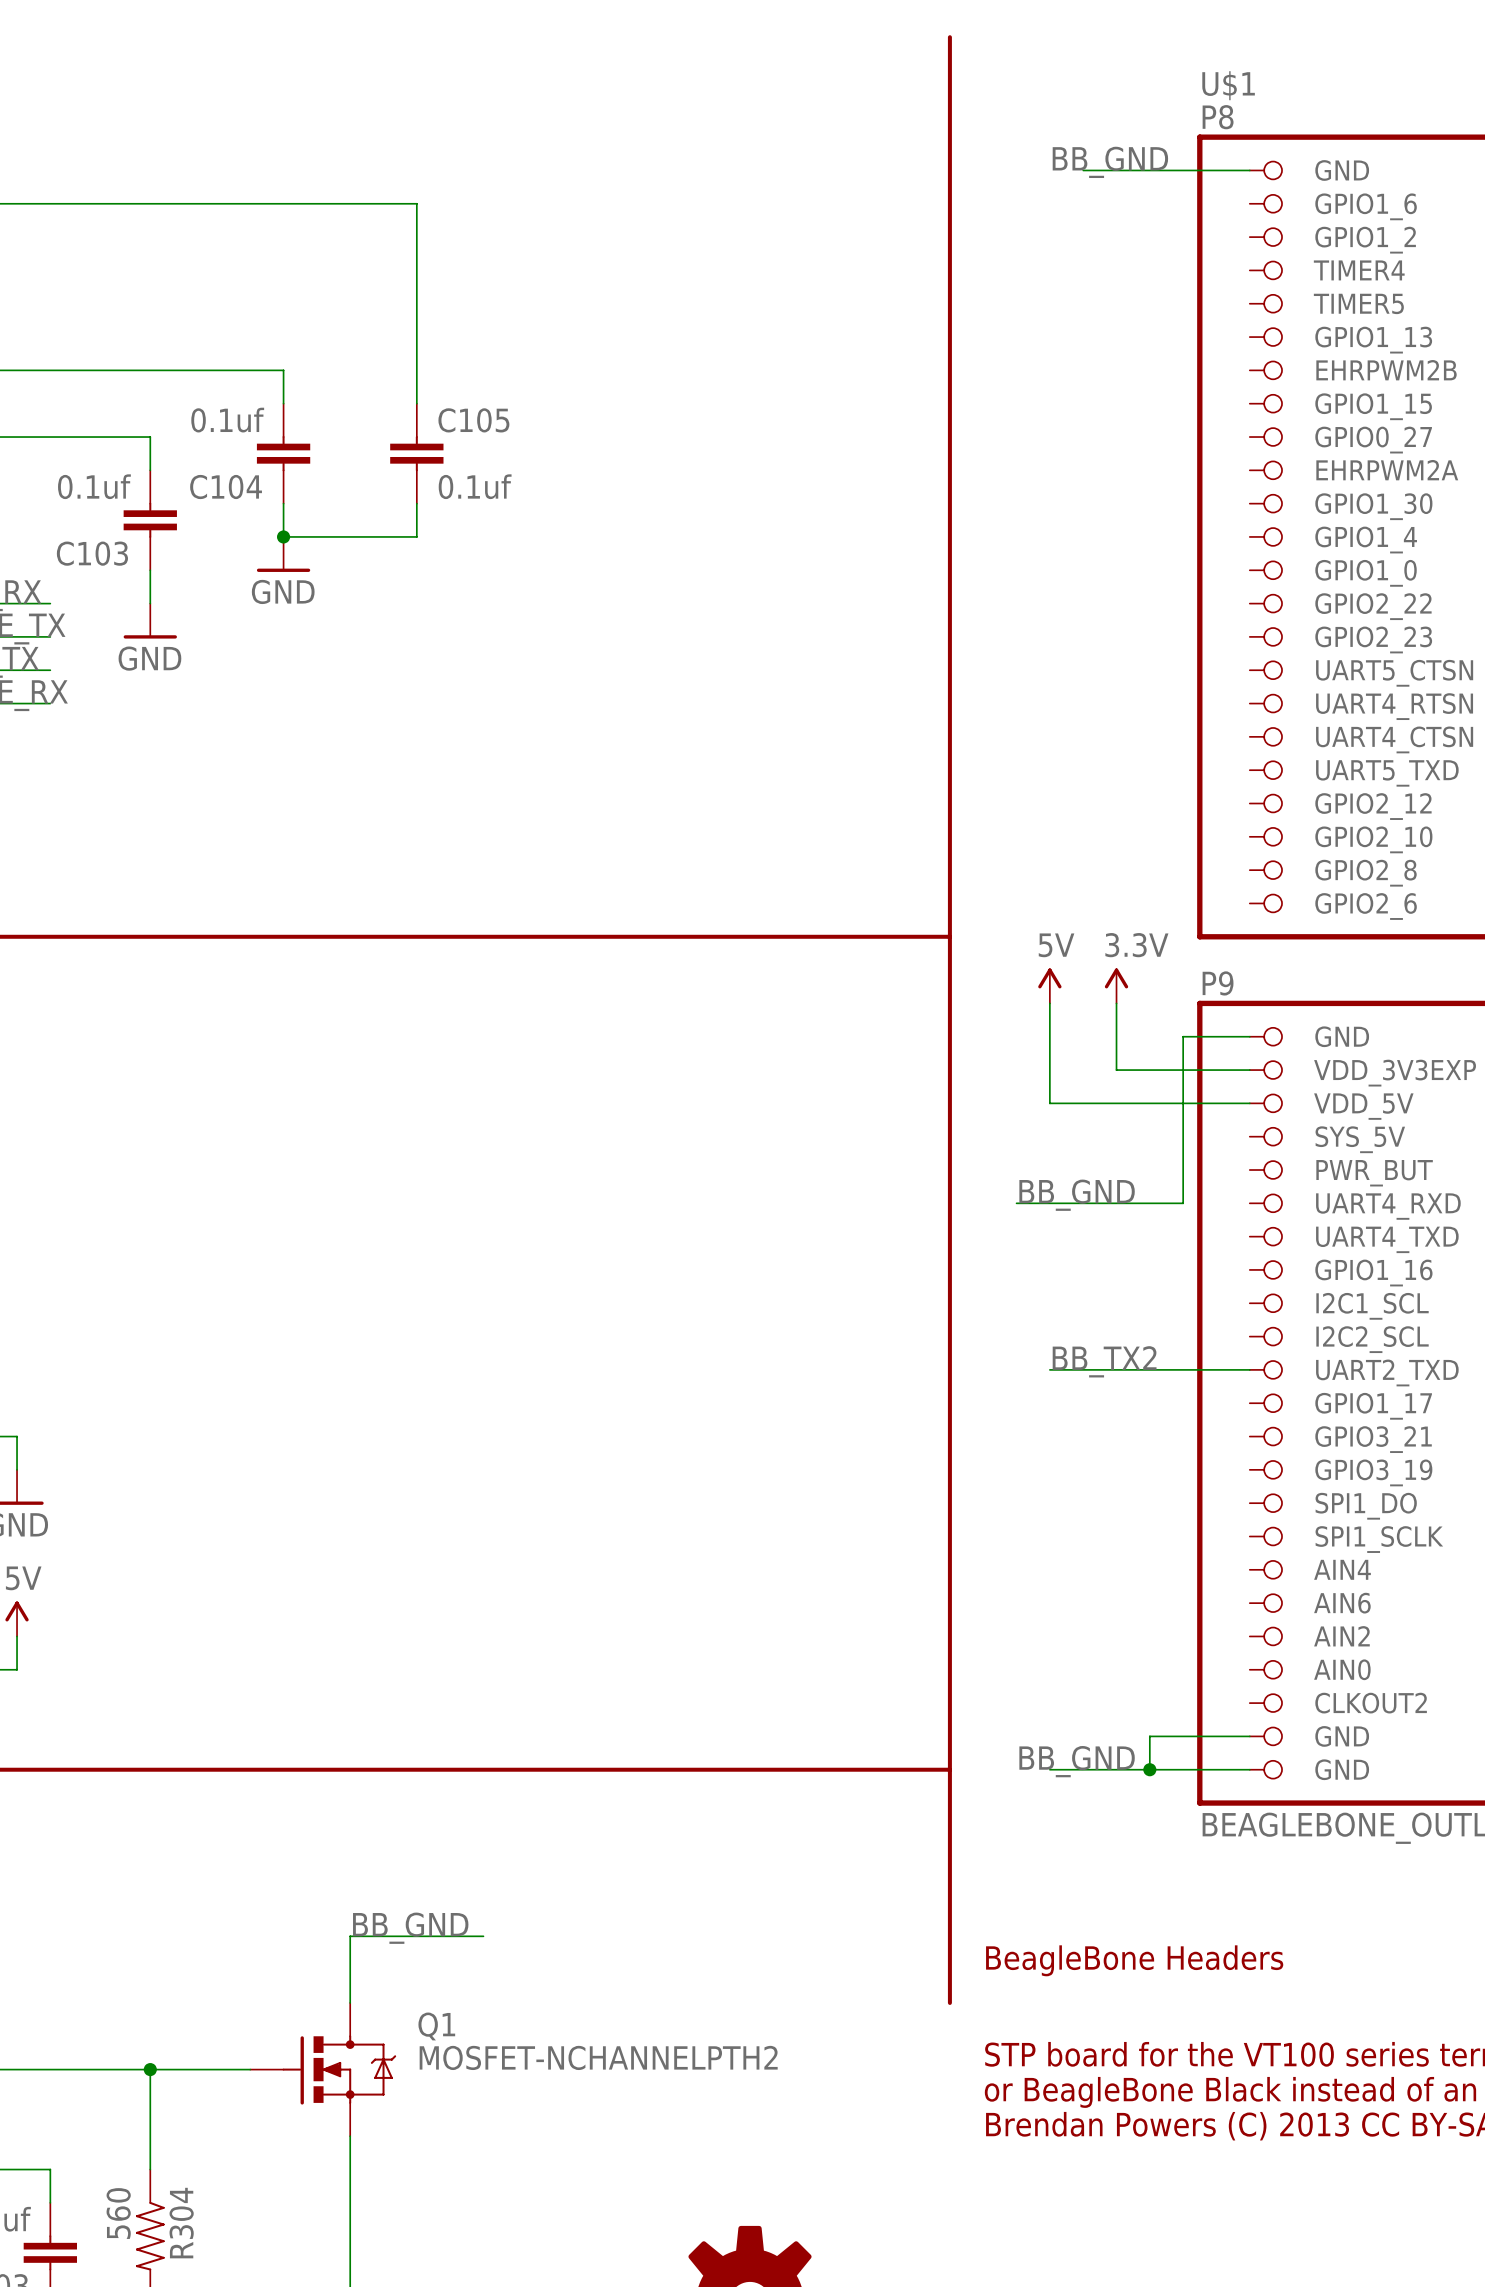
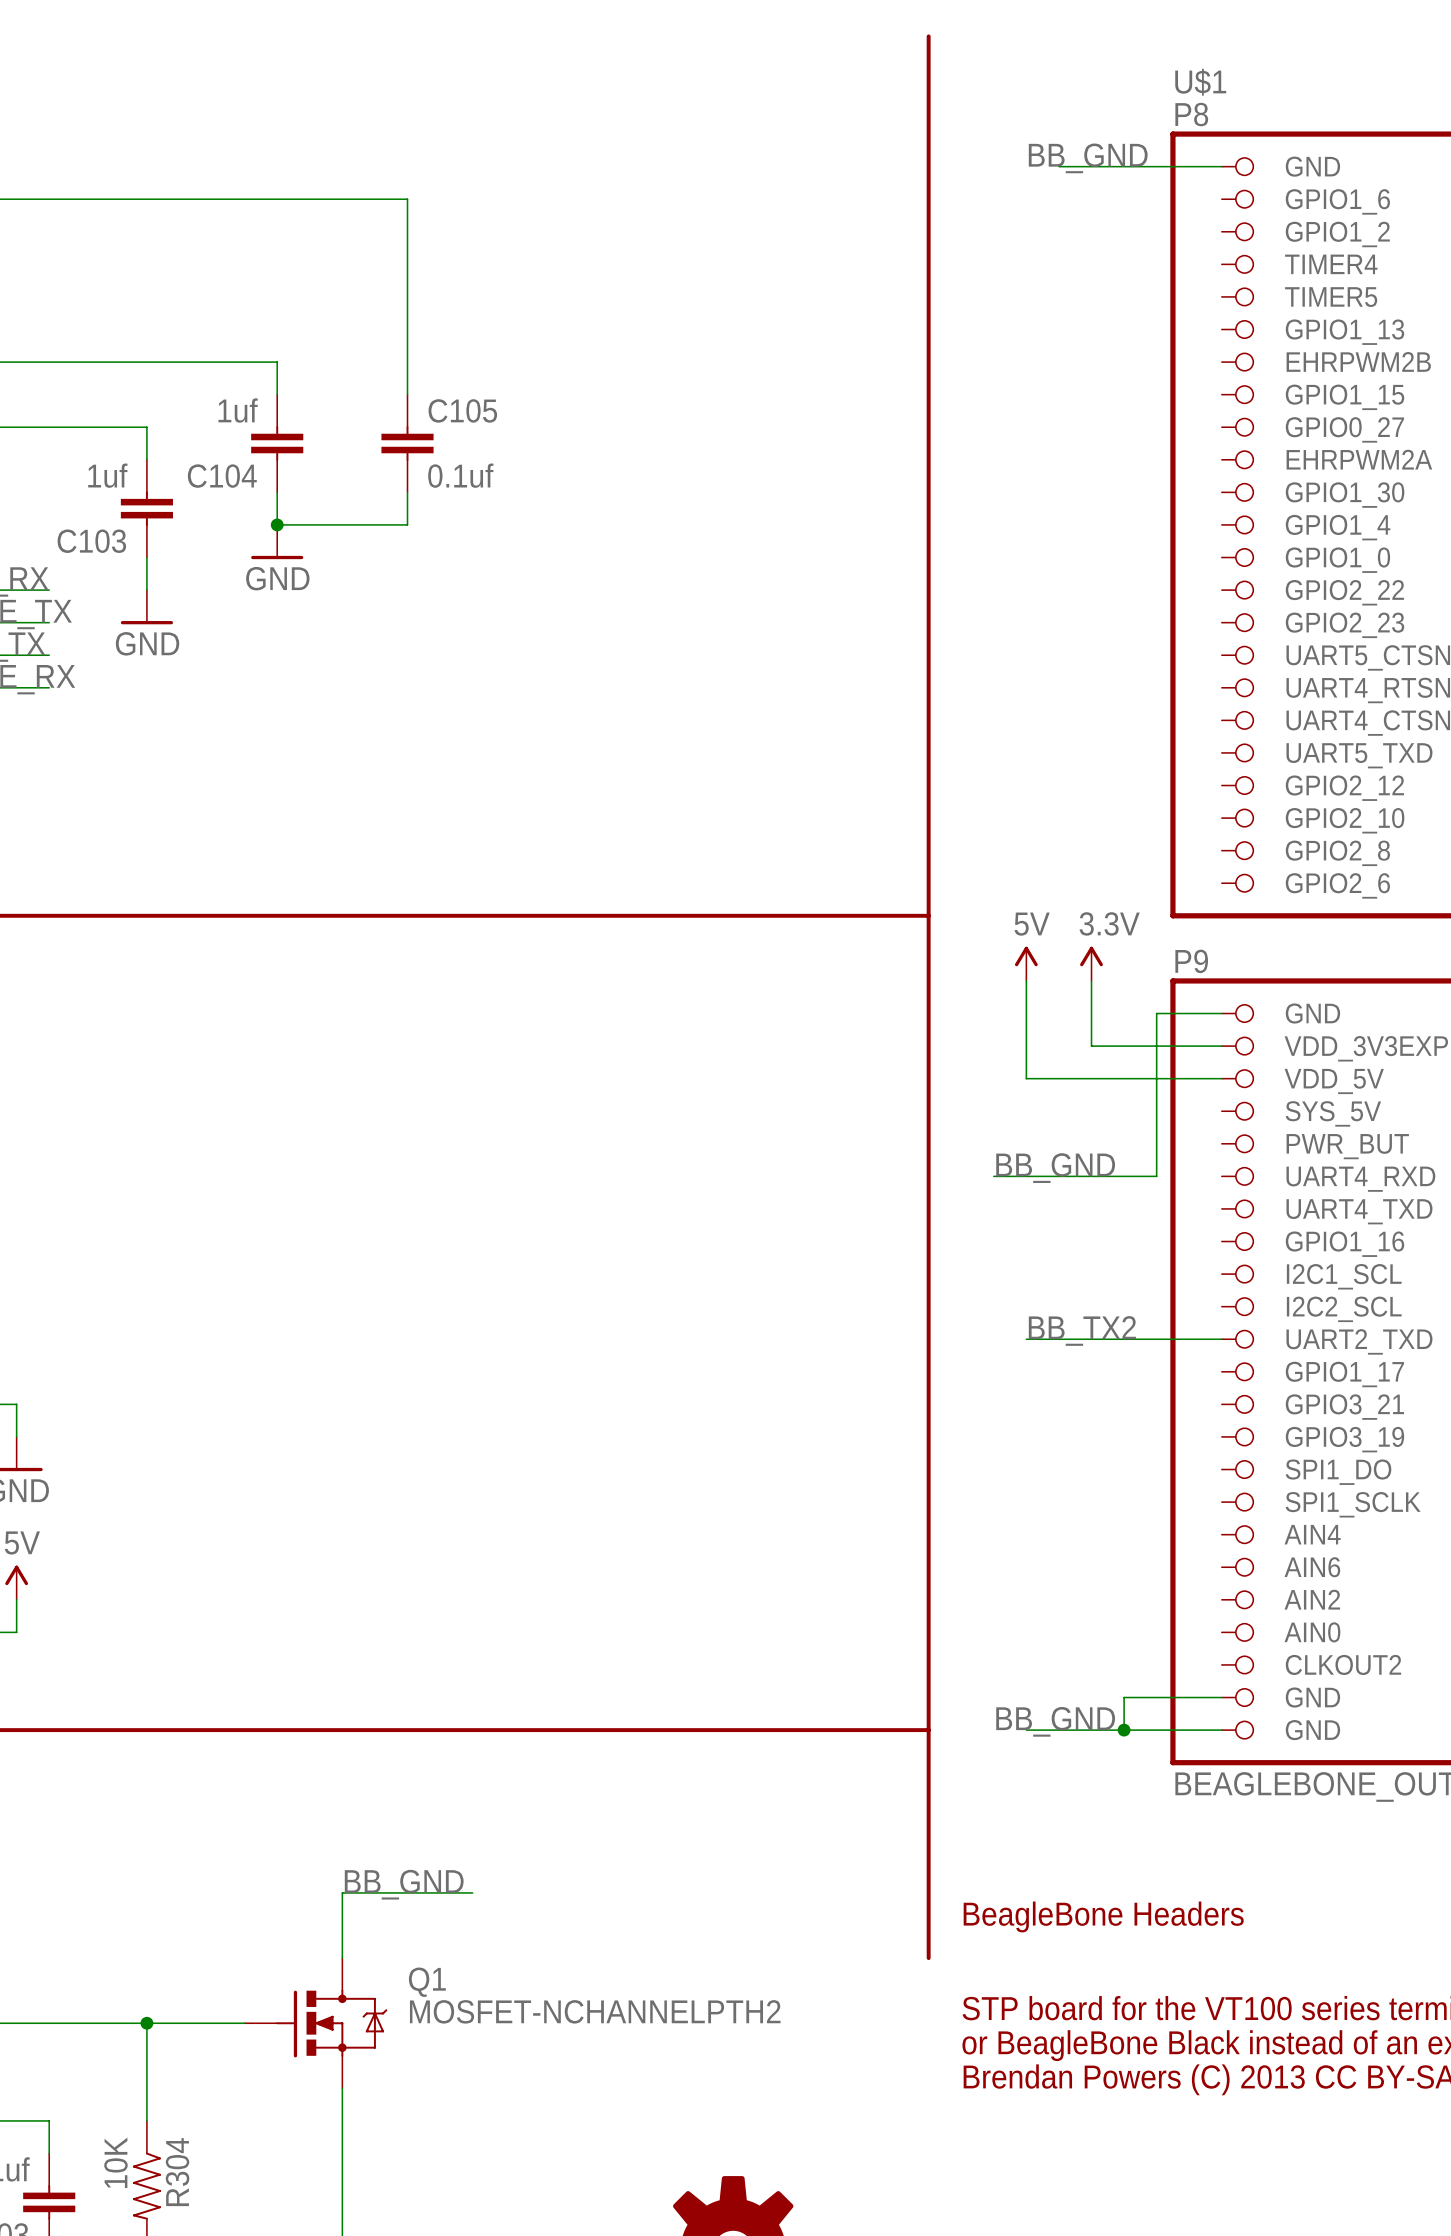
C104 value: 0.1uf (227, 420) -> 1uf (238, 410)
C103 value: 0.1uf (94, 486) -> 1uf (107, 475)
R304 value: 560 (118, 2213) -> 10K (115, 2162)

